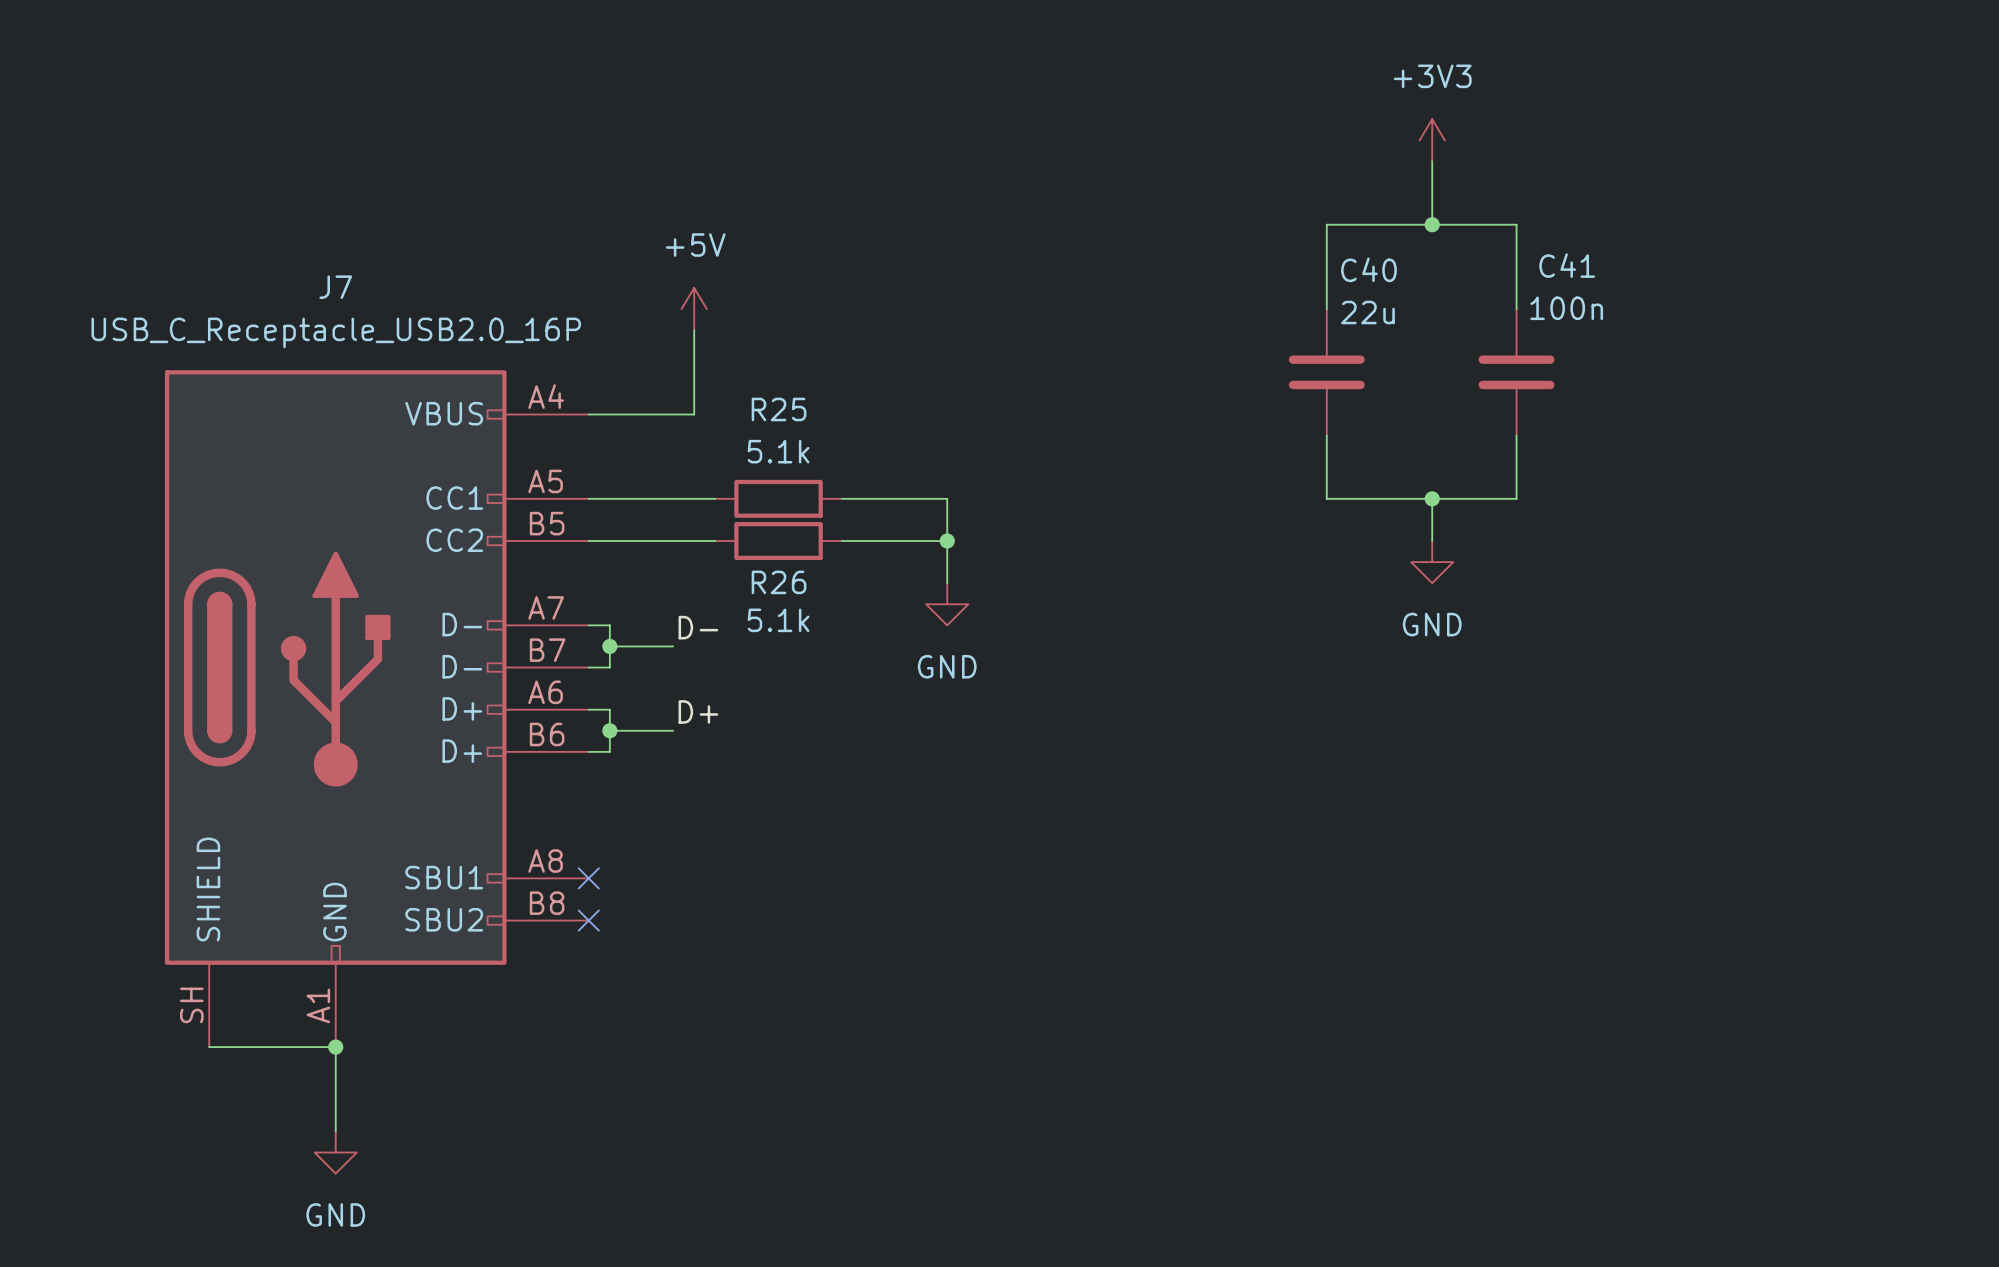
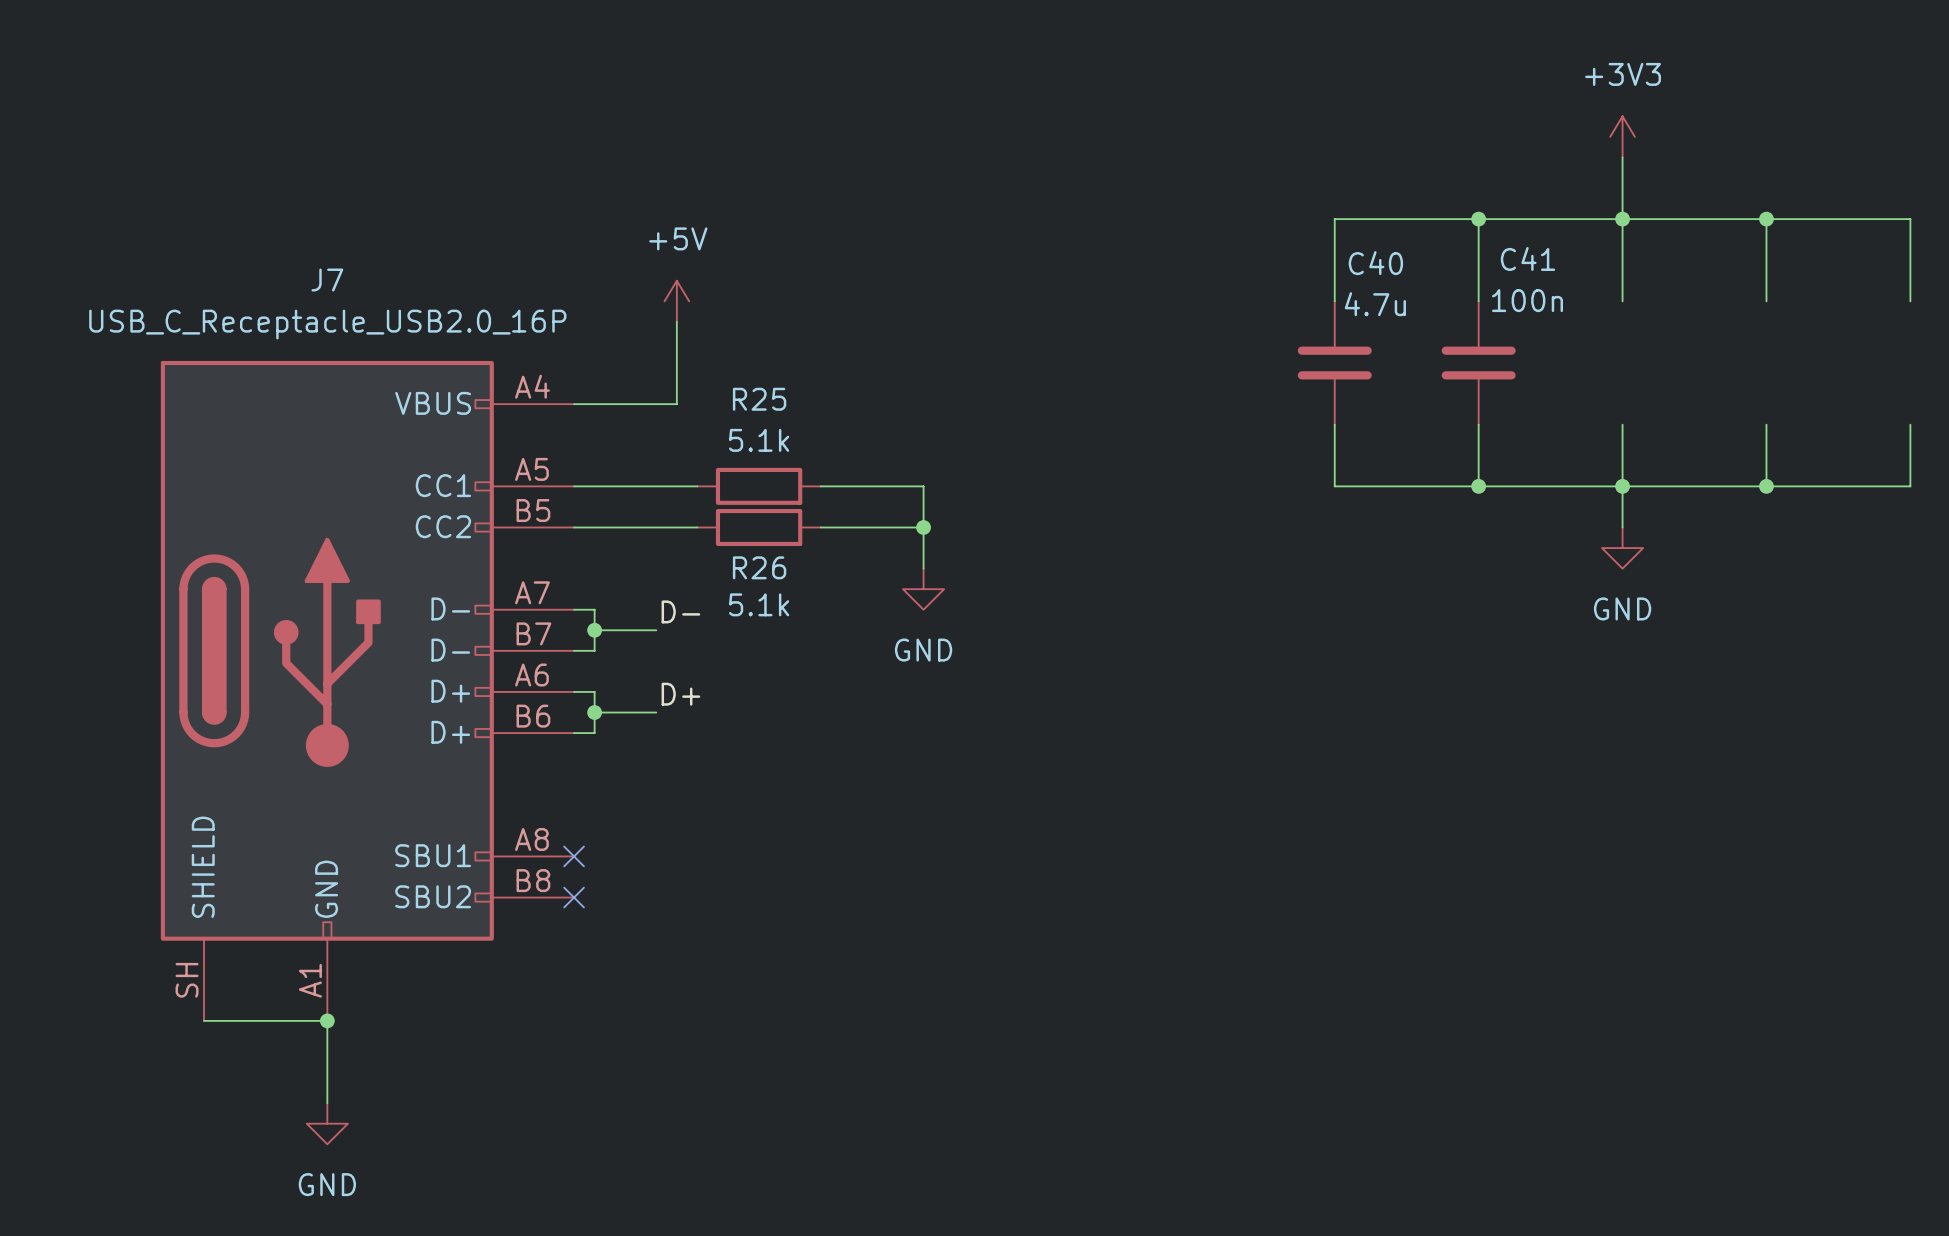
power symbol position: +3V3 (1432, 140) -> +3V3 (1622, 136)
wire: (1432, 161) (1432, 224) -> none
wire: none -> (1622, 157) (1622, 301)
wire: (1368, 224) (1326, 224) (1326, 309) -> (1334, 219) (1334, 301)
junction position: (1432, 224) -> (1478, 219)
wire: none -> (1478, 219) (1910, 219) (1910, 301)
junction: none -> (1622, 219)
wire: none -> (1766, 219) (1766, 301)
junction: none -> (1766, 219)
C40 value: 22u (1367, 312) -> 4.7u (1375, 304)
C40 position: (1326, 372) -> (1334, 363)
wire: (1326, 435) (1326, 498) (1368, 498) -> (1334, 424) (1334, 486)
wire: none -> (1622, 424) (1622, 527)
wire: none -> (1766, 424) (1766, 486)
wire: none -> (1910, 424) (1910, 486) (1478, 486)
wire: (1432, 498) (1432, 541) -> none
junction position: (1432, 498) -> (1478, 486)
junction: none -> (1622, 486)
junction: none -> (1766, 486)
power symbol position: GND (1432, 562) -> GND (1622, 548)

